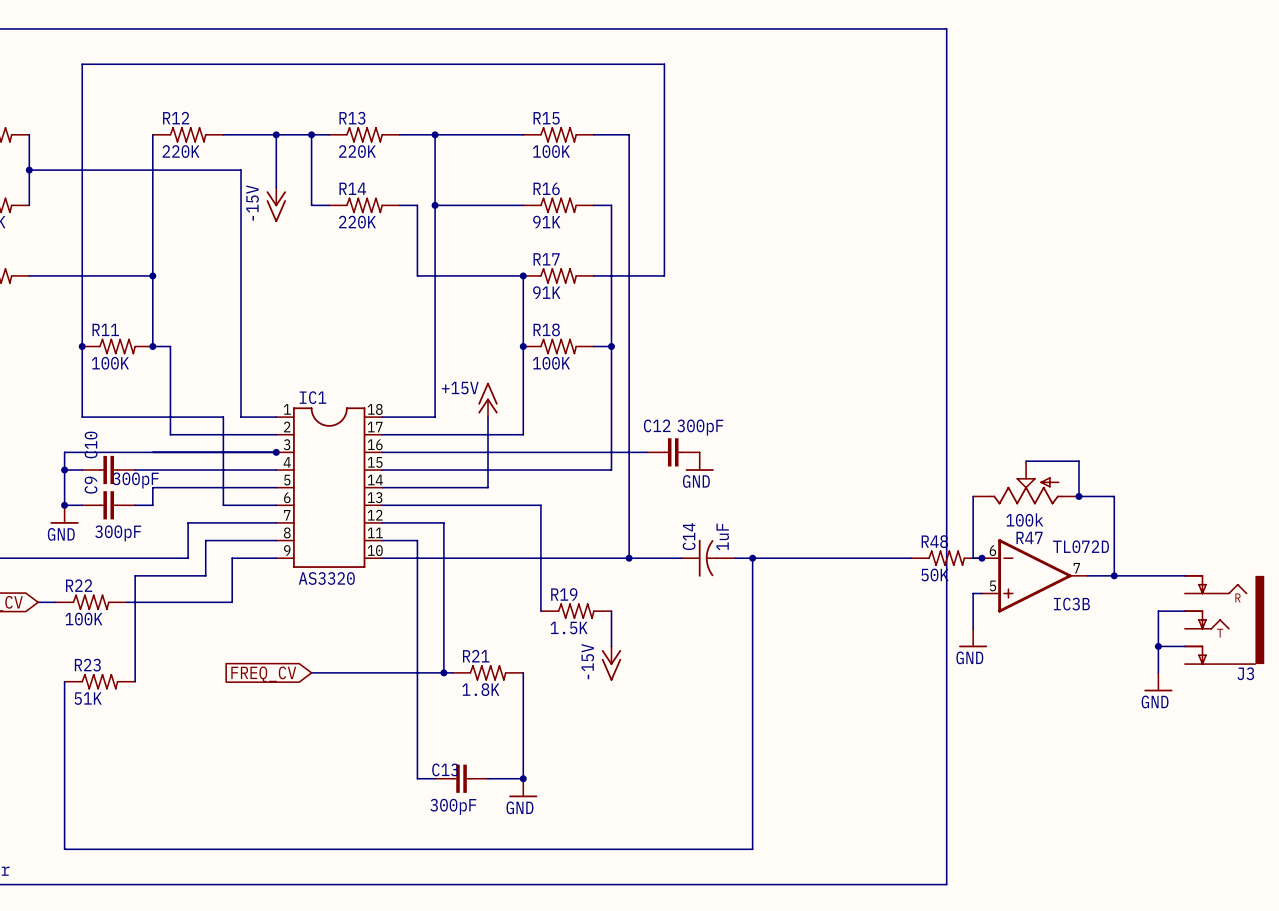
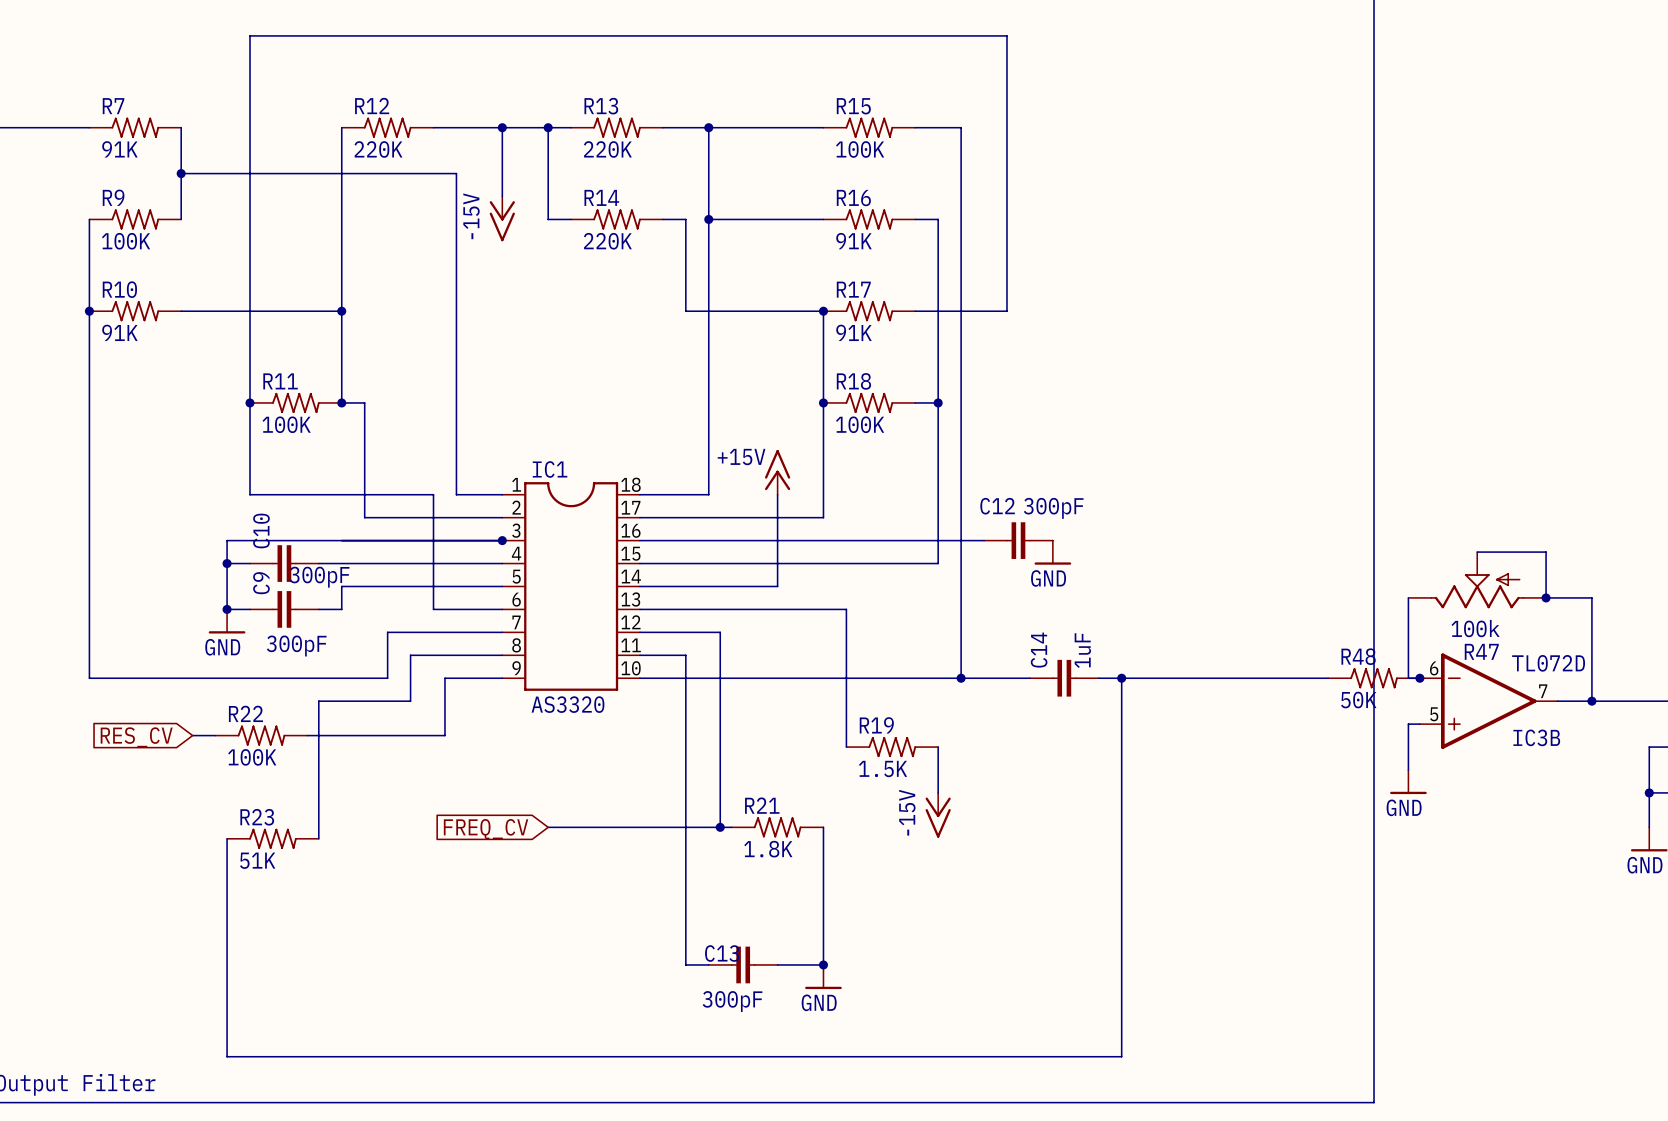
C14 symbol: [682, 539, 735, 577] -> [1029, 659, 1099, 697]

